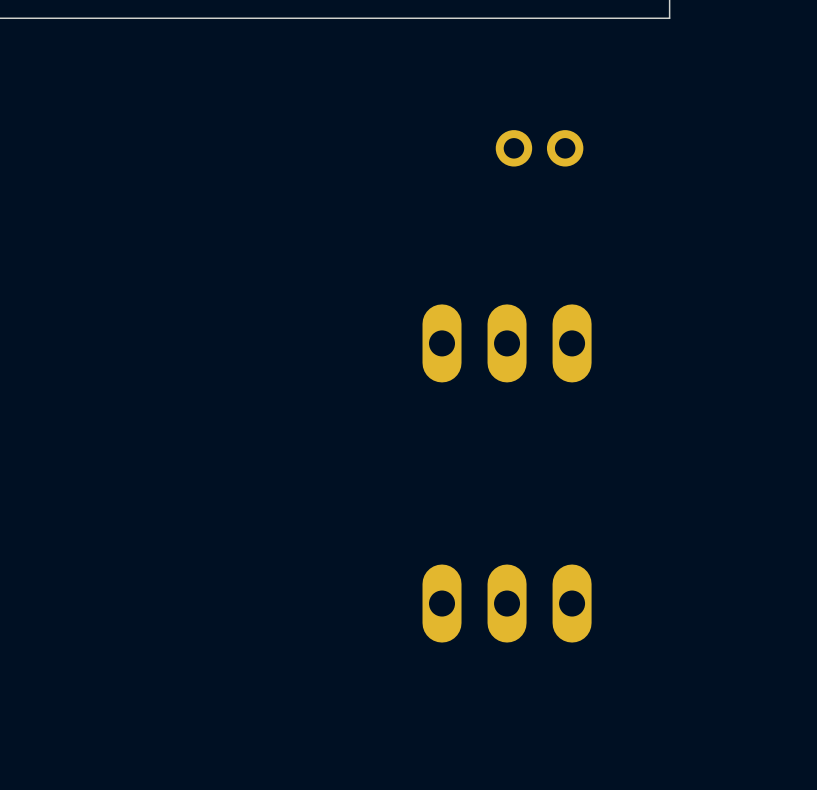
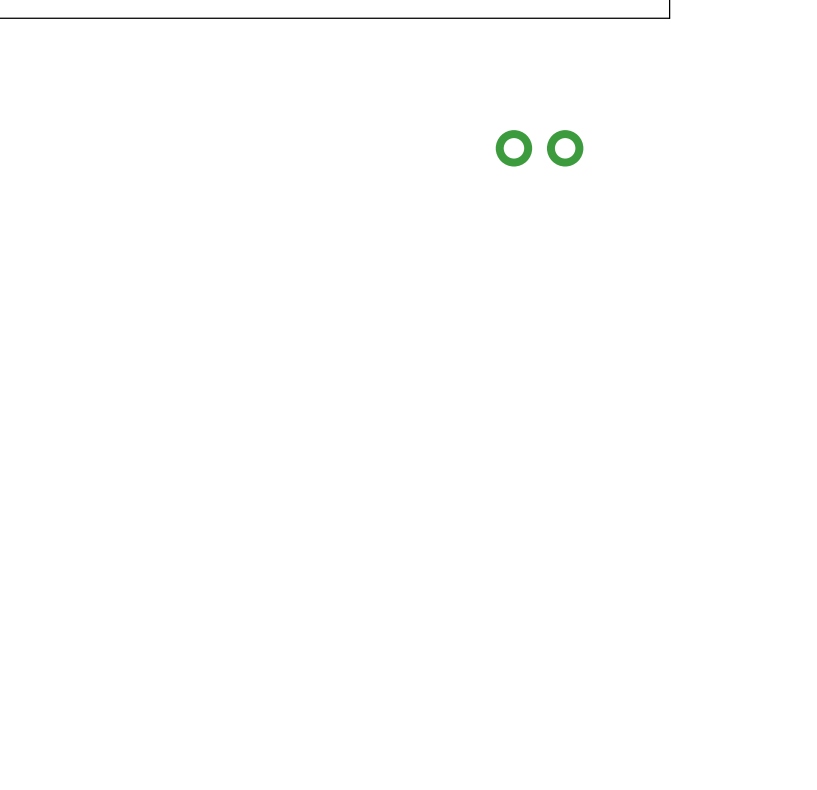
part: (507, 343) -> none
part: (507, 603) -> none

